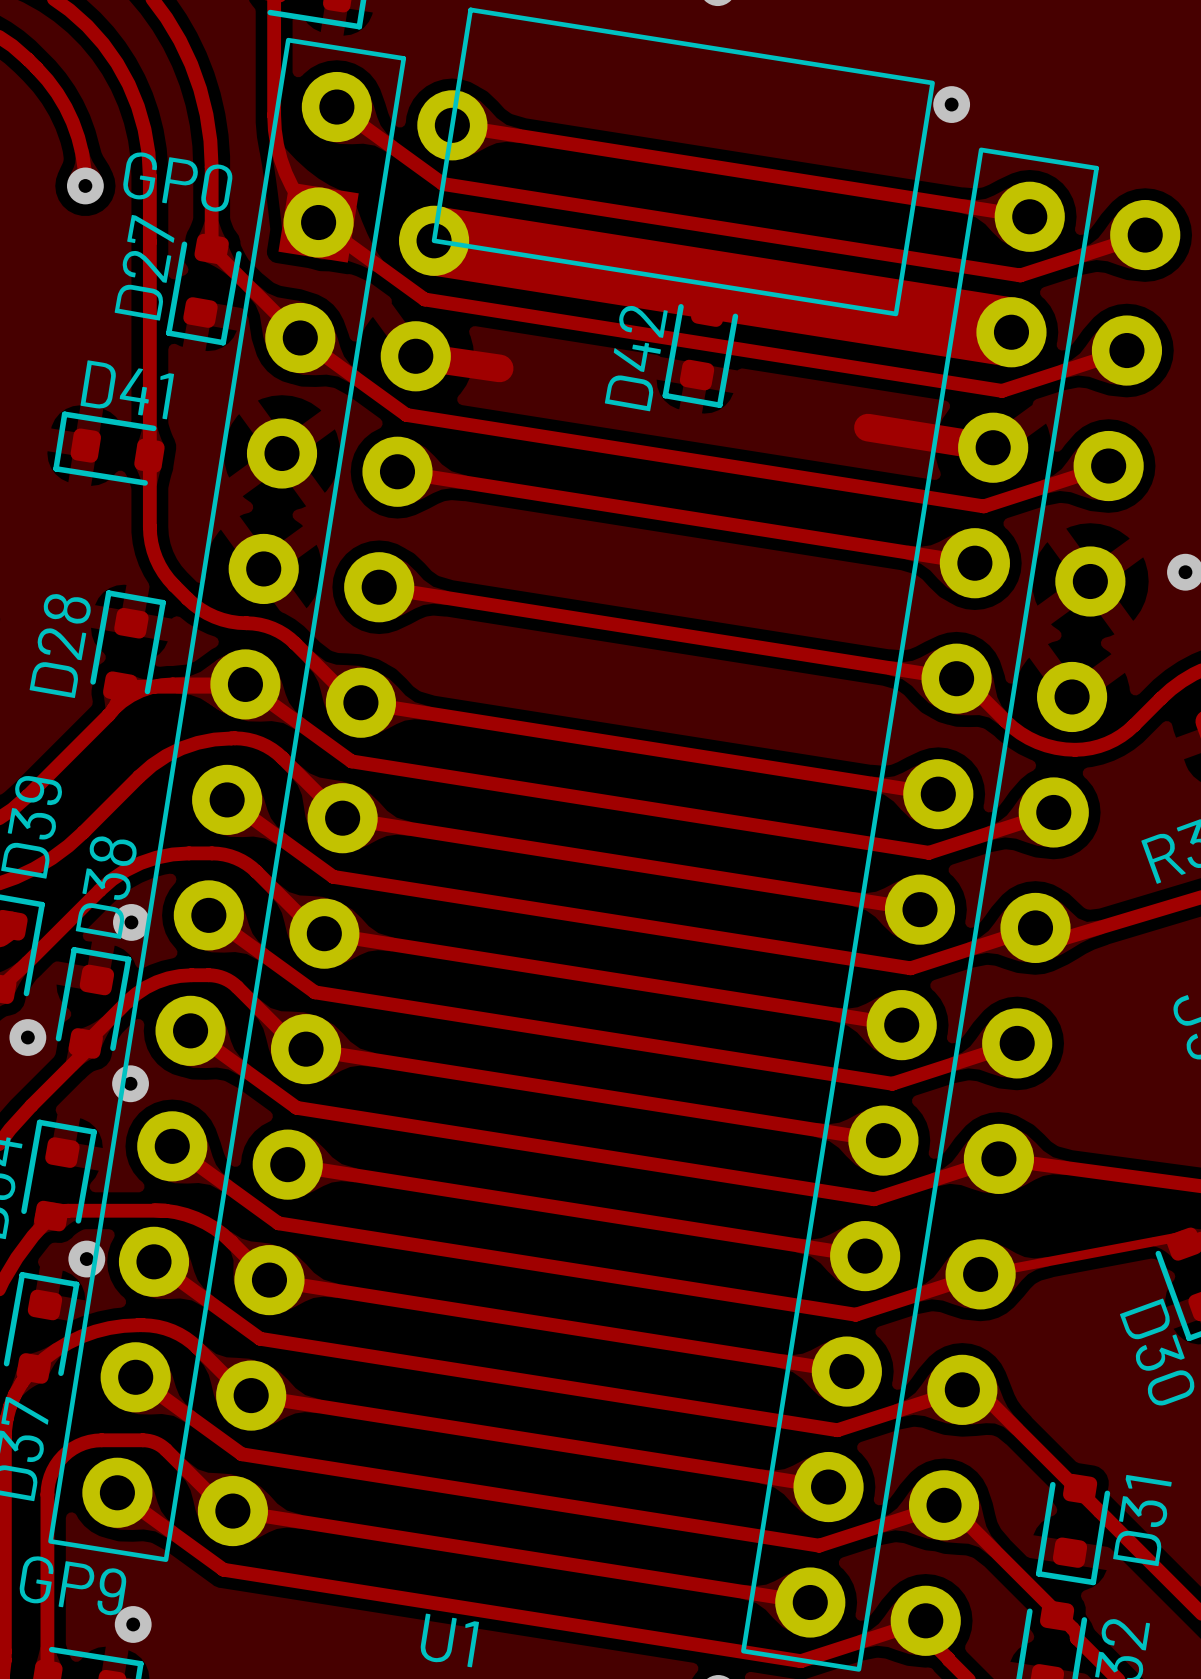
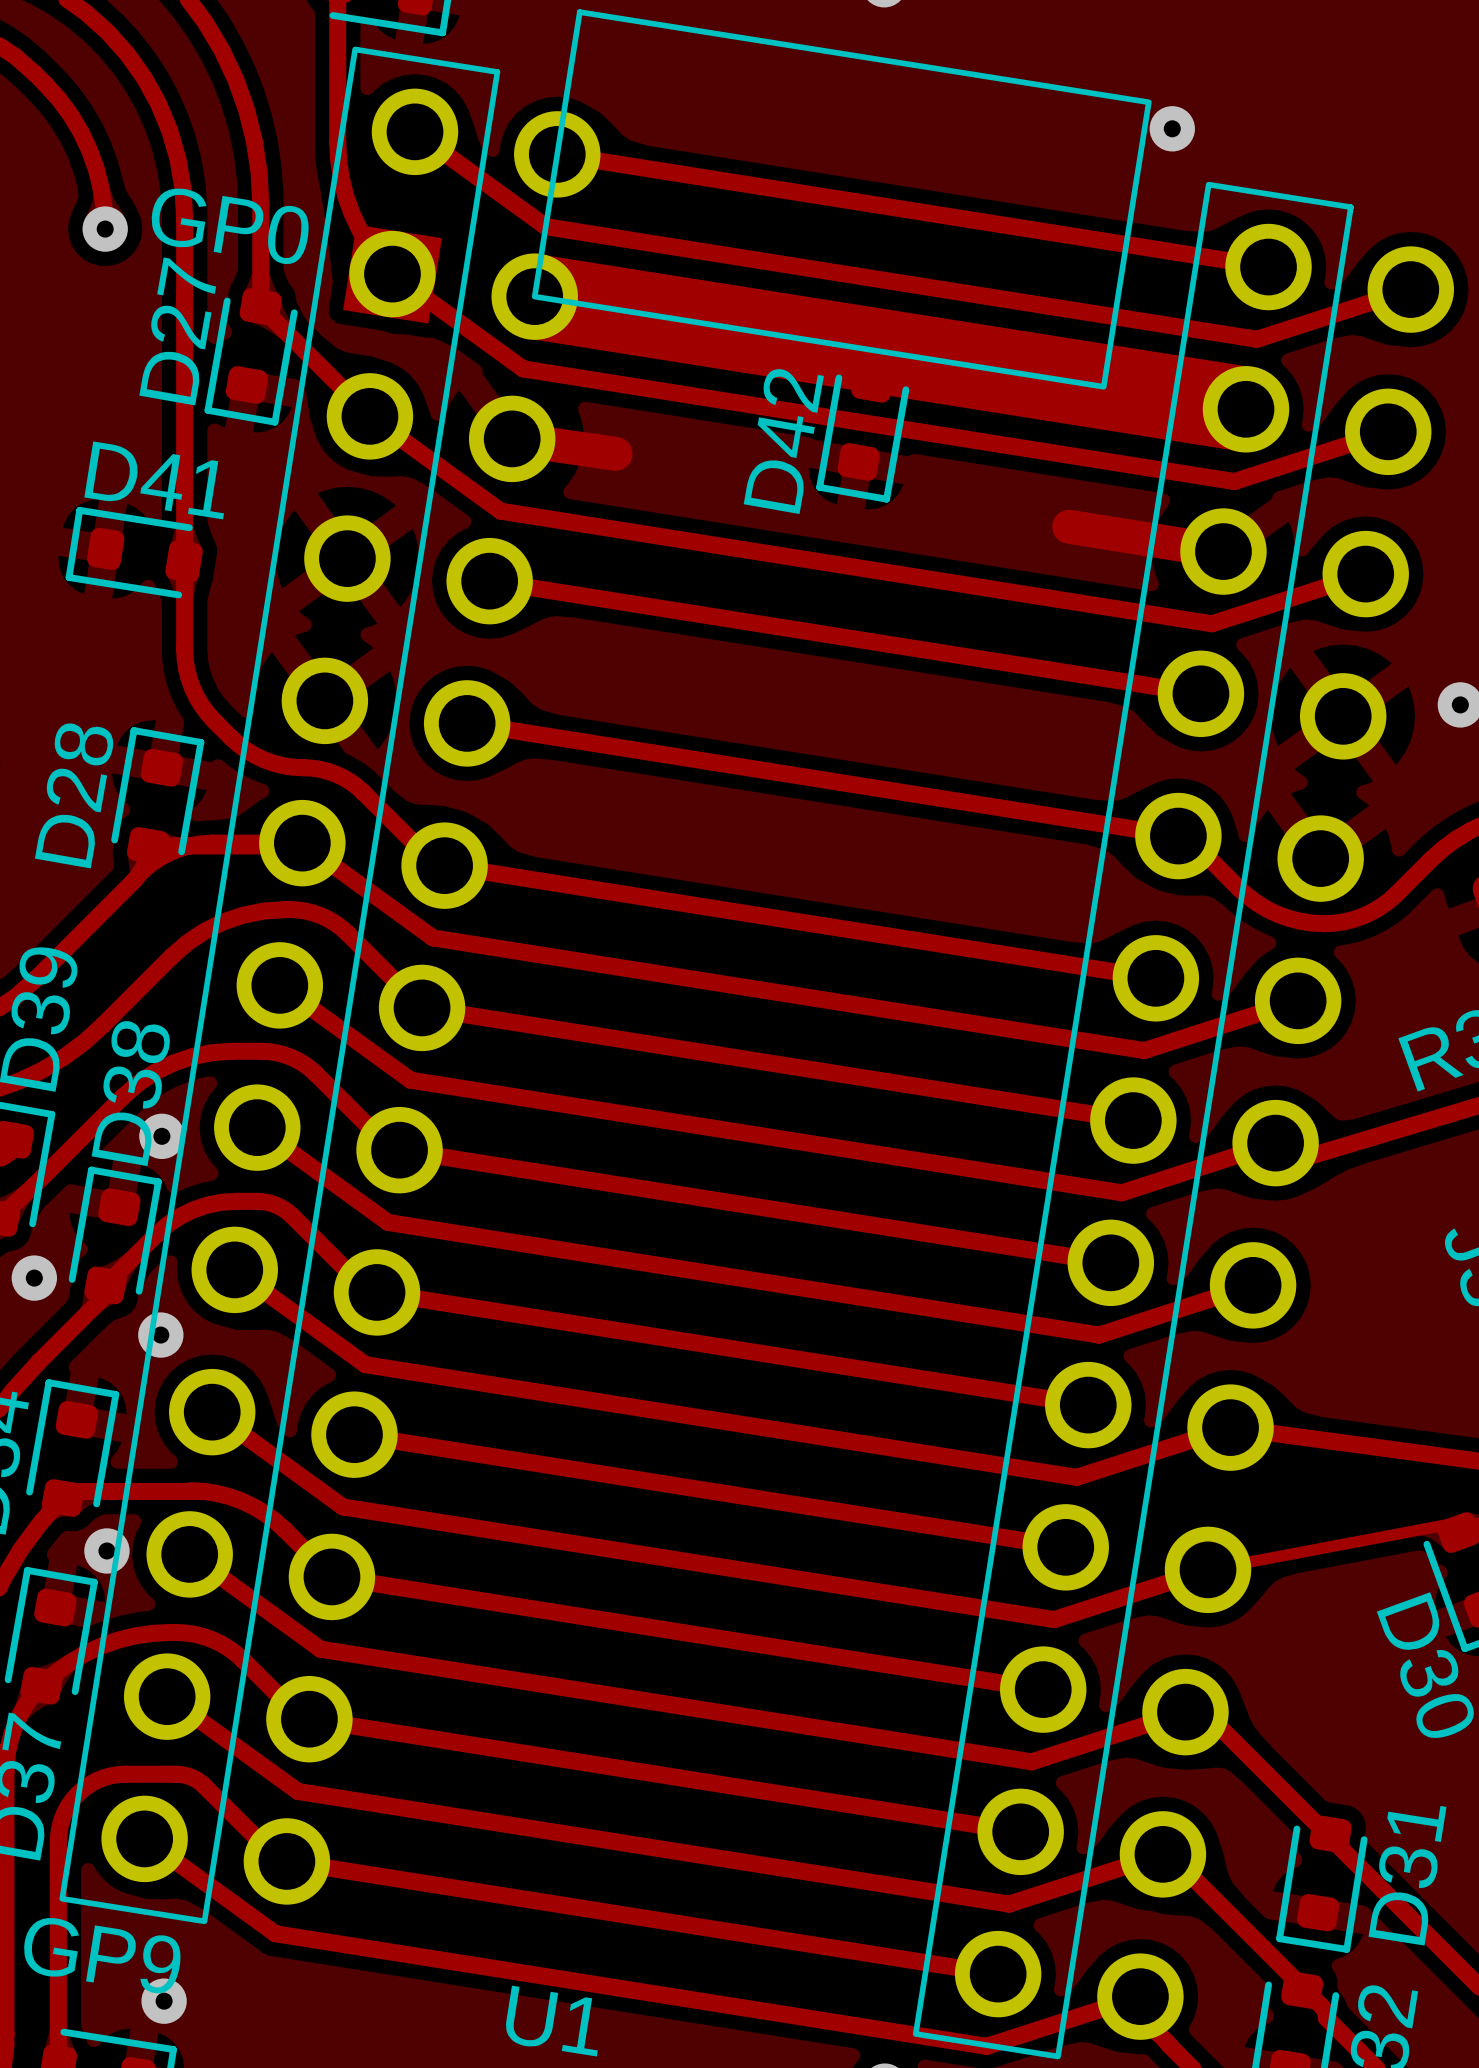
U1 footprint: [48, 7, 1181, 1672] -> [59, 9, 1454, 2060]

